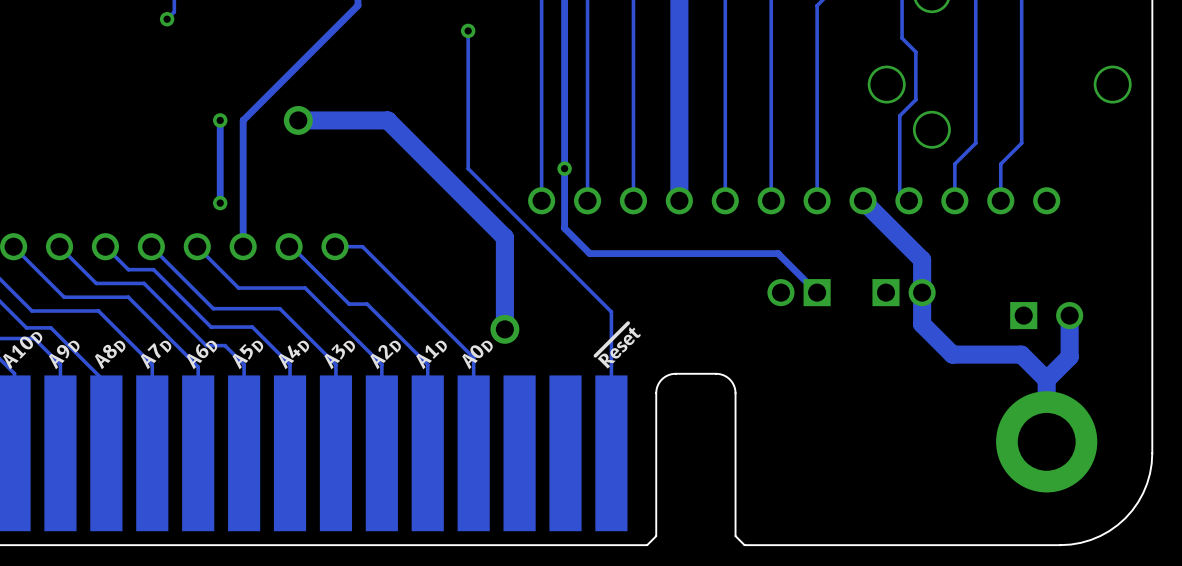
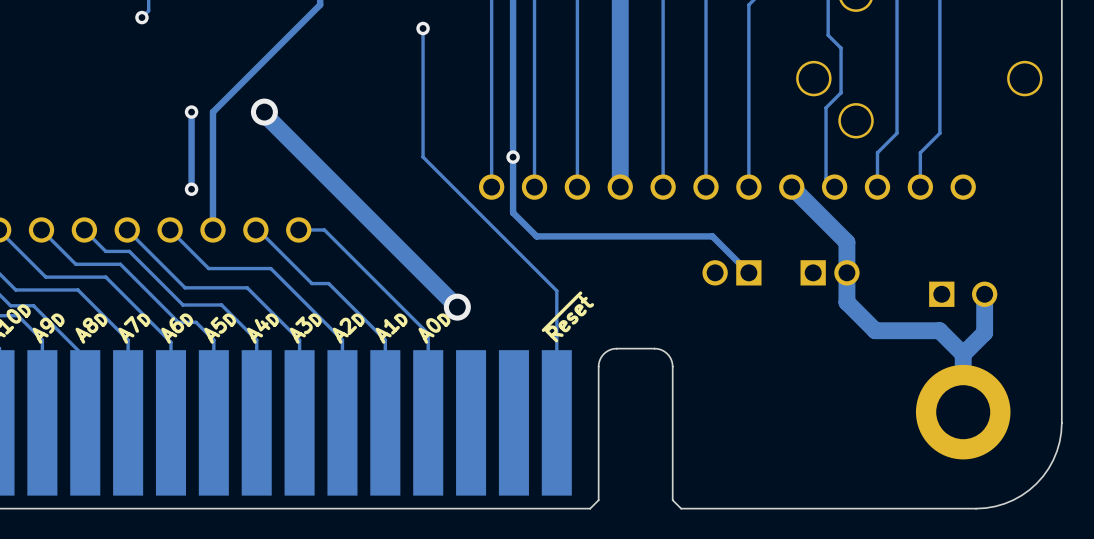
track: (298, 120) (387, 120) (504, 237) (504, 329) -> (264, 112) (264, 114) (457, 307)

